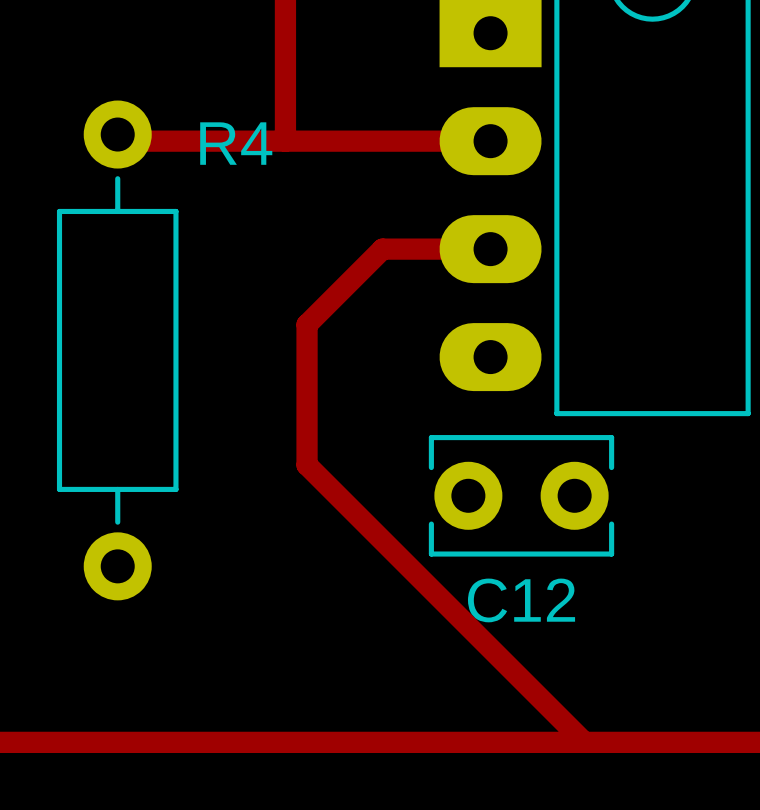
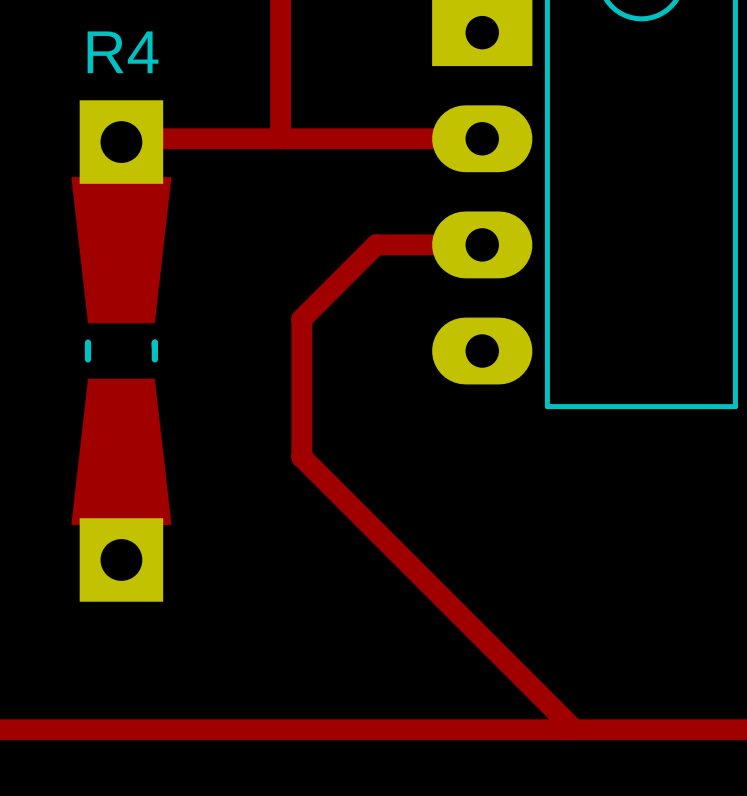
R4 footprint: [56, 100, 179, 601] -> [71, 100, 172, 602]
R4 name position: R4 (236, 143) -> R4 (123, 52)
C12: (521, 495) -> none

